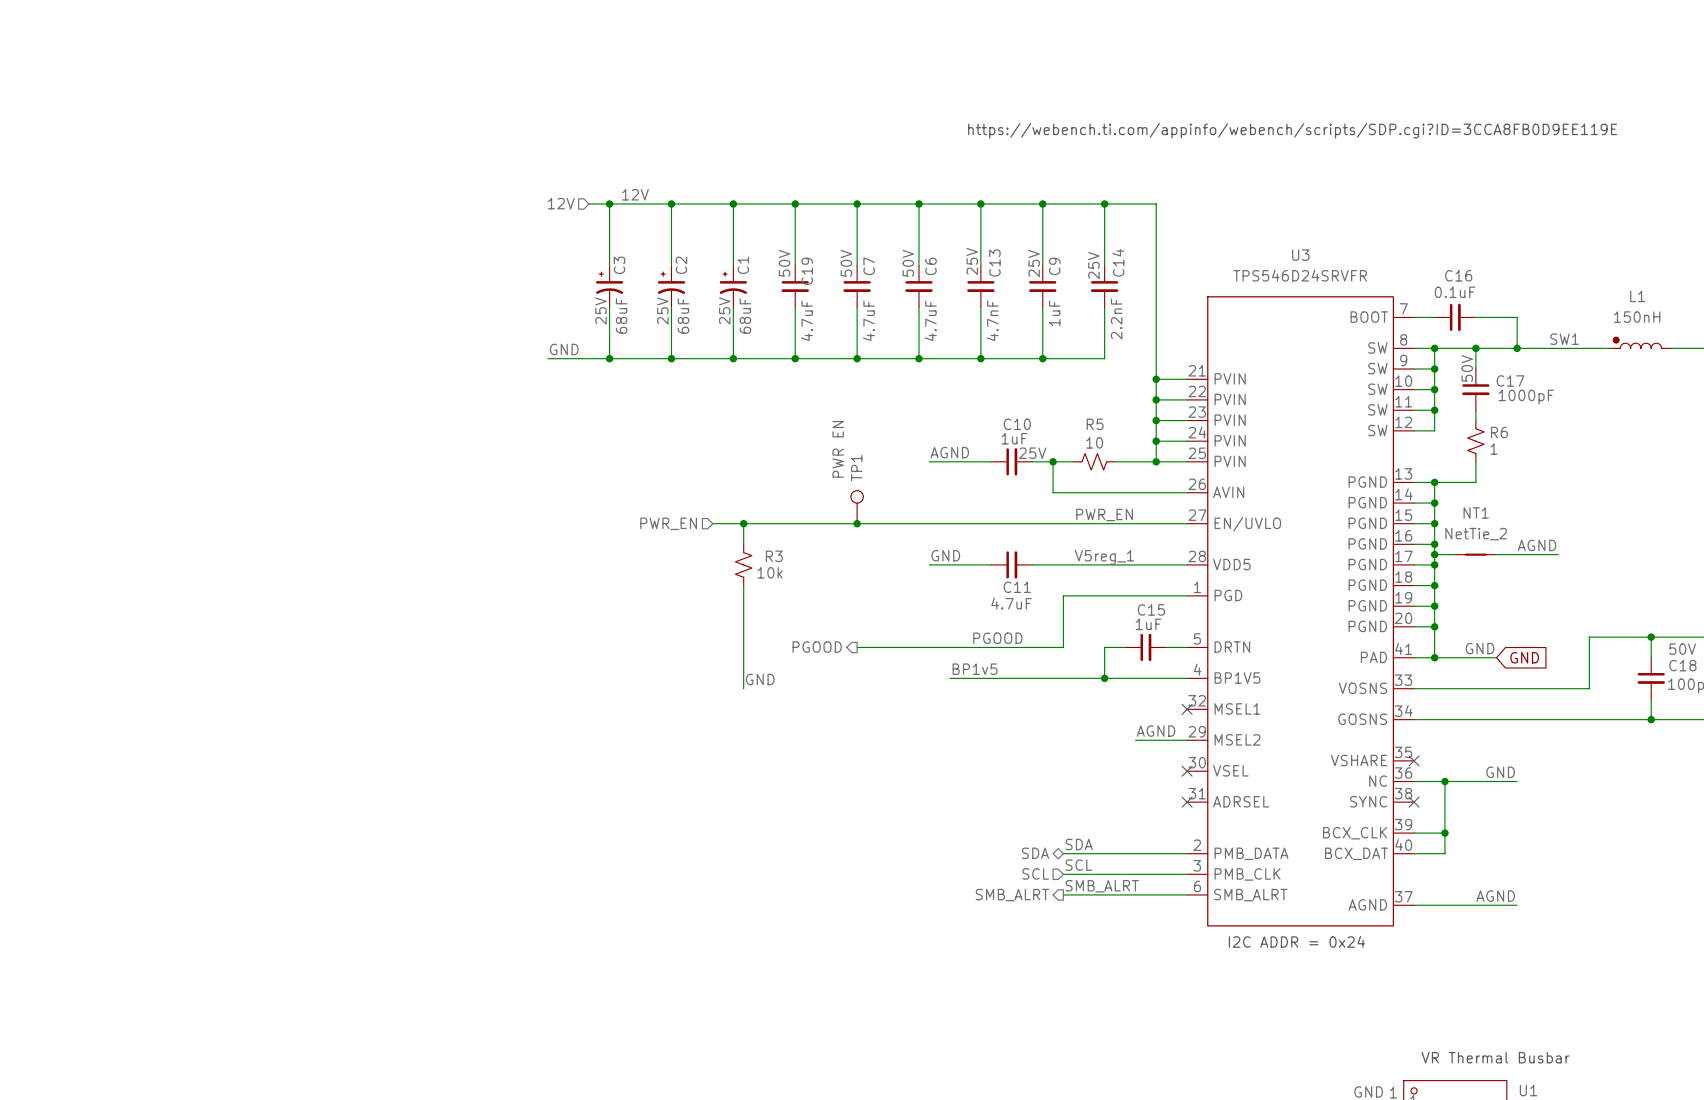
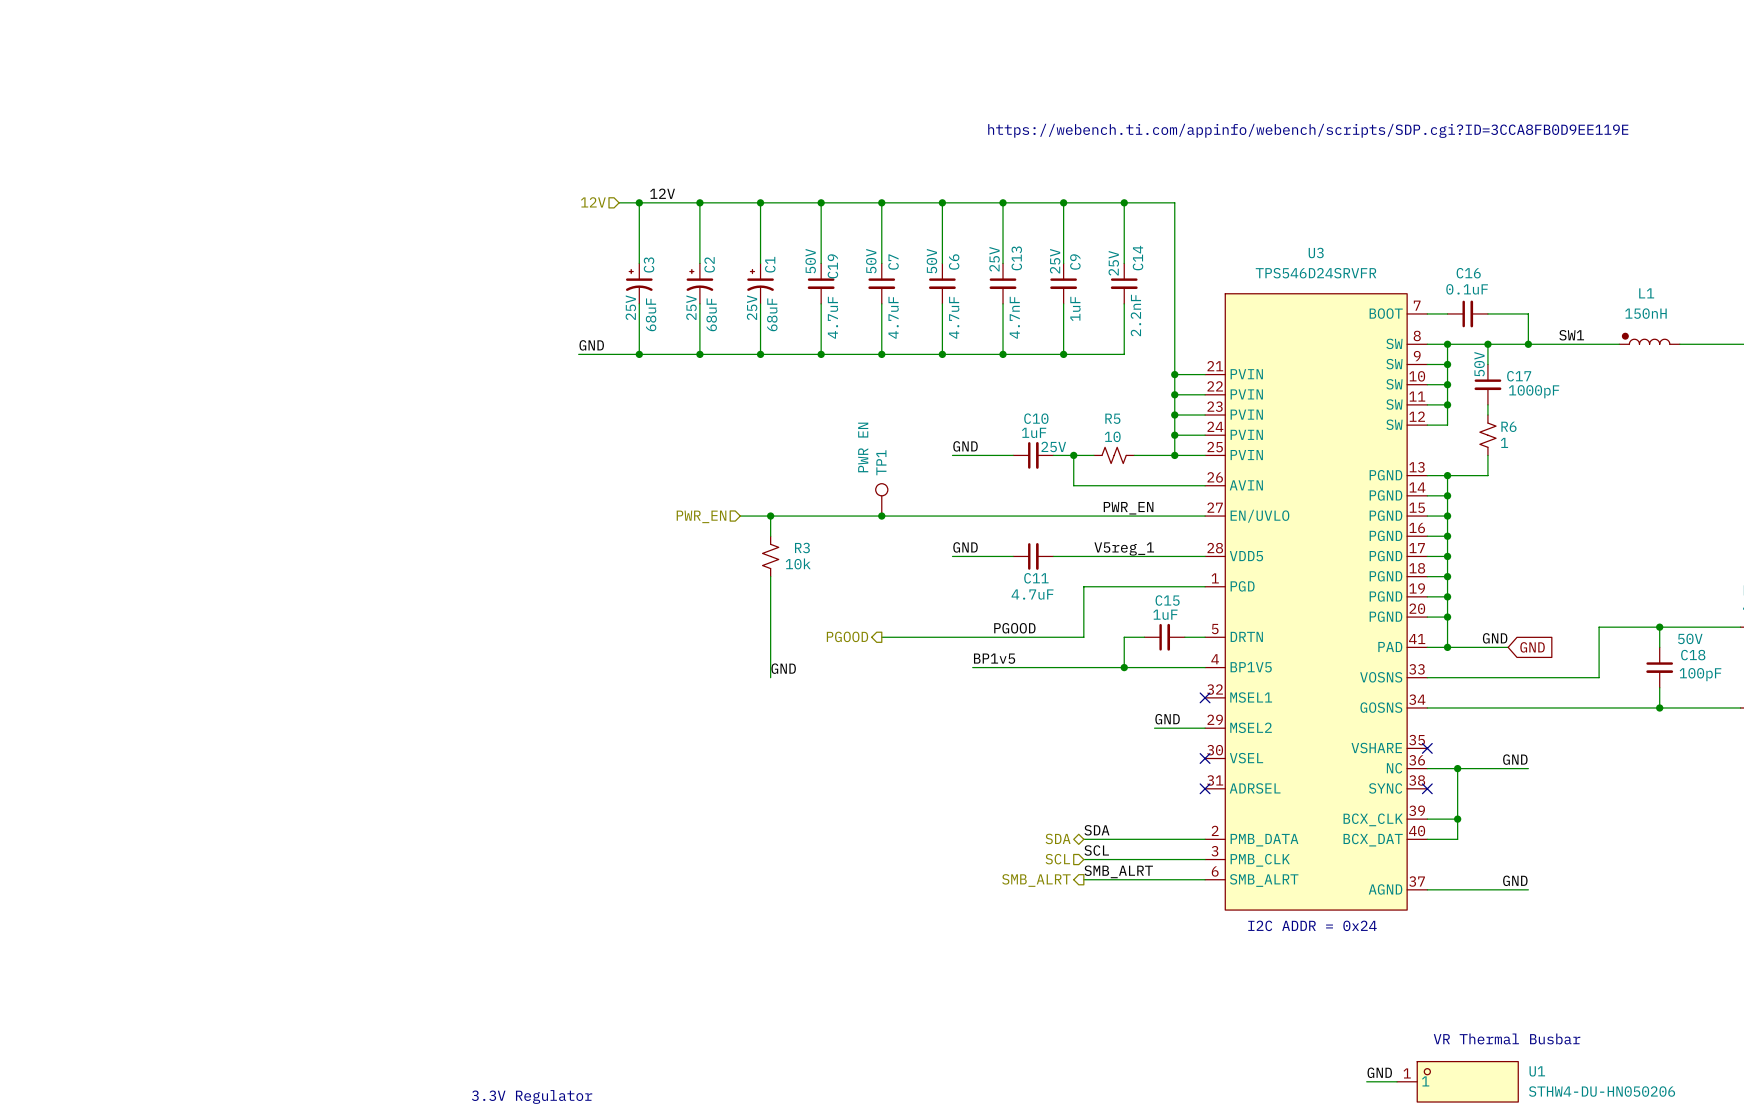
label: AGND (949, 452) -> GND (965, 446)
label: AGND (1536, 545) -> none
wire: (1434, 554) (1455, 554) -> none
junction: (1434, 554) -> none
NT1: NetTie_2 (1475, 554) -> none
wire: (1496, 554) (1558, 554) -> none
label: AGND (1156, 731) -> GND (1167, 719)
label: AGND (1495, 896) -> GND (1515, 880)

